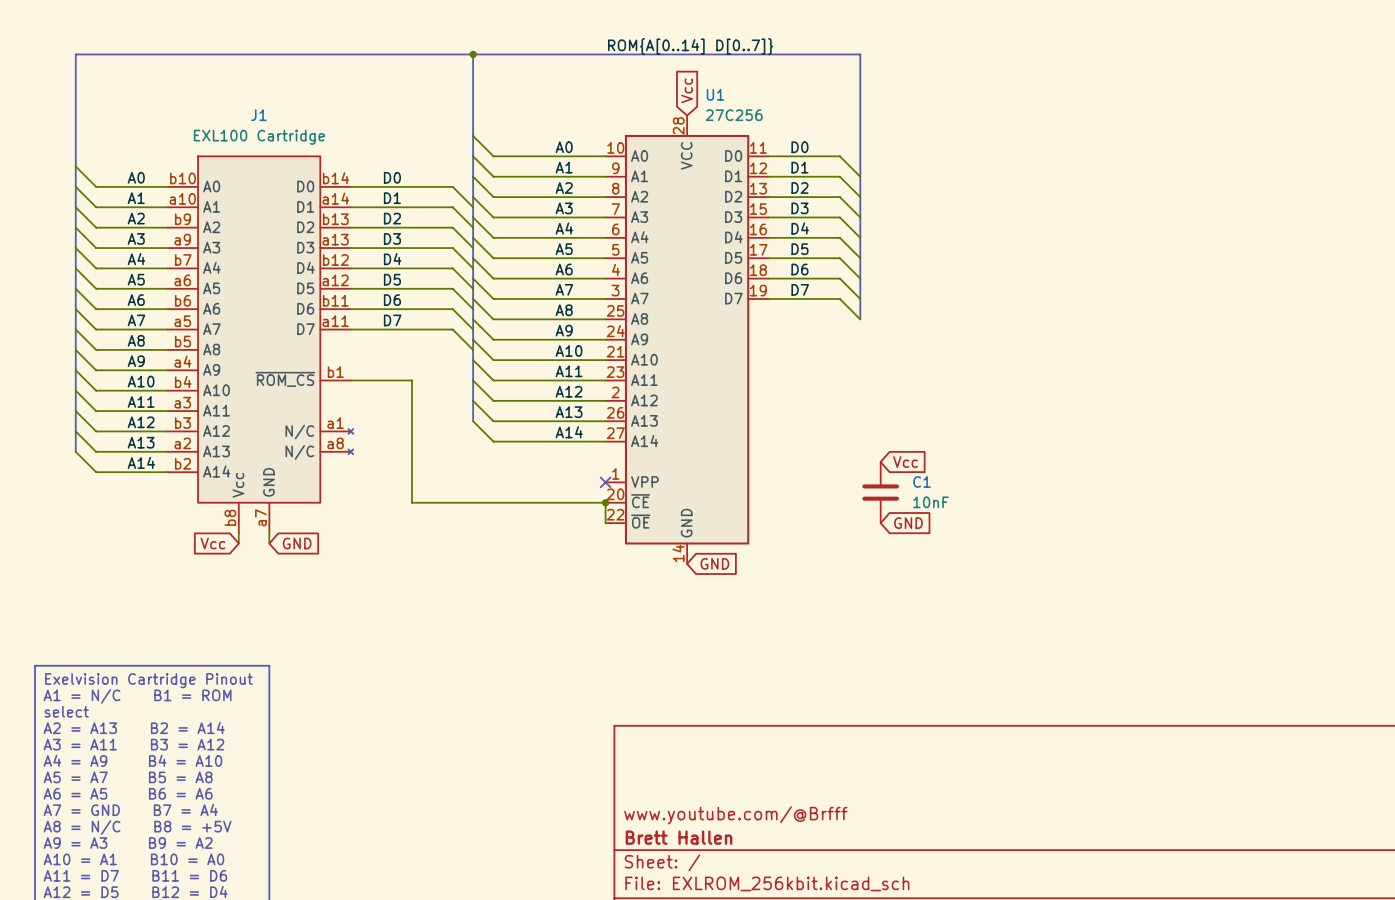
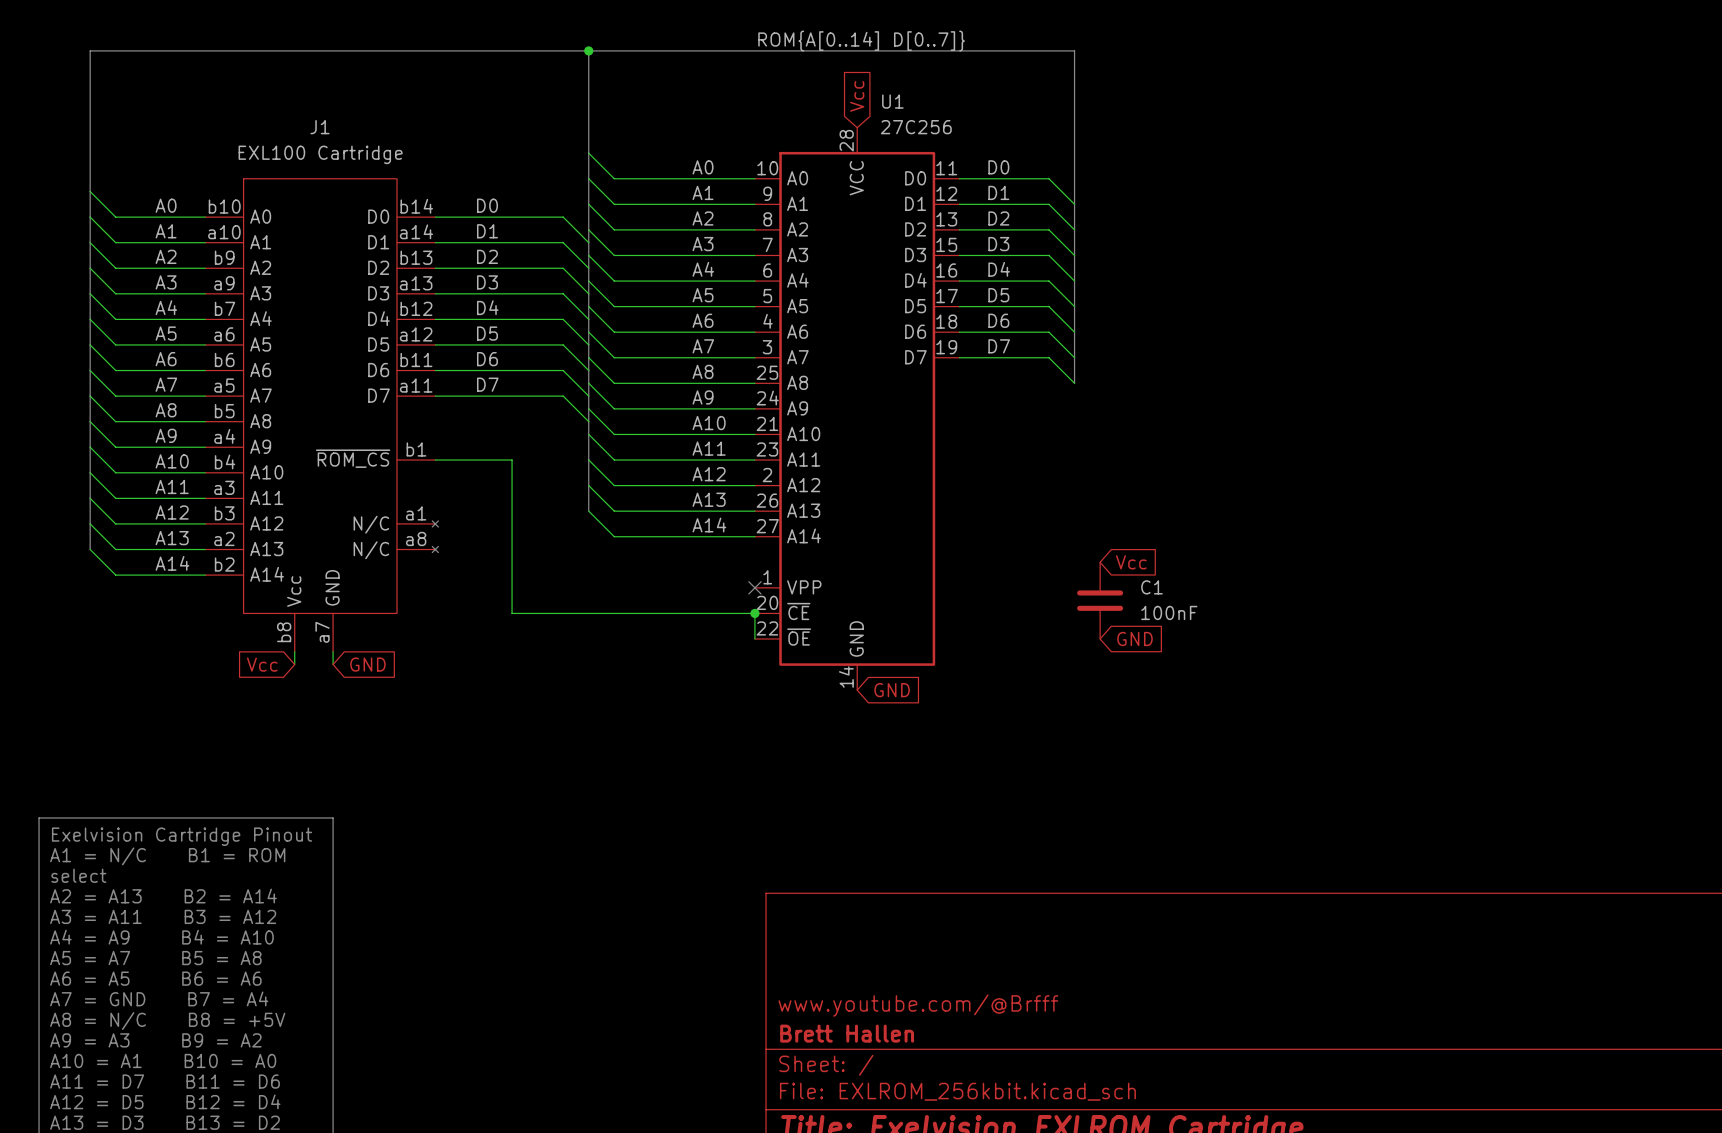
C1 value: 10nF (930, 502) -> 100nF (1169, 612)

